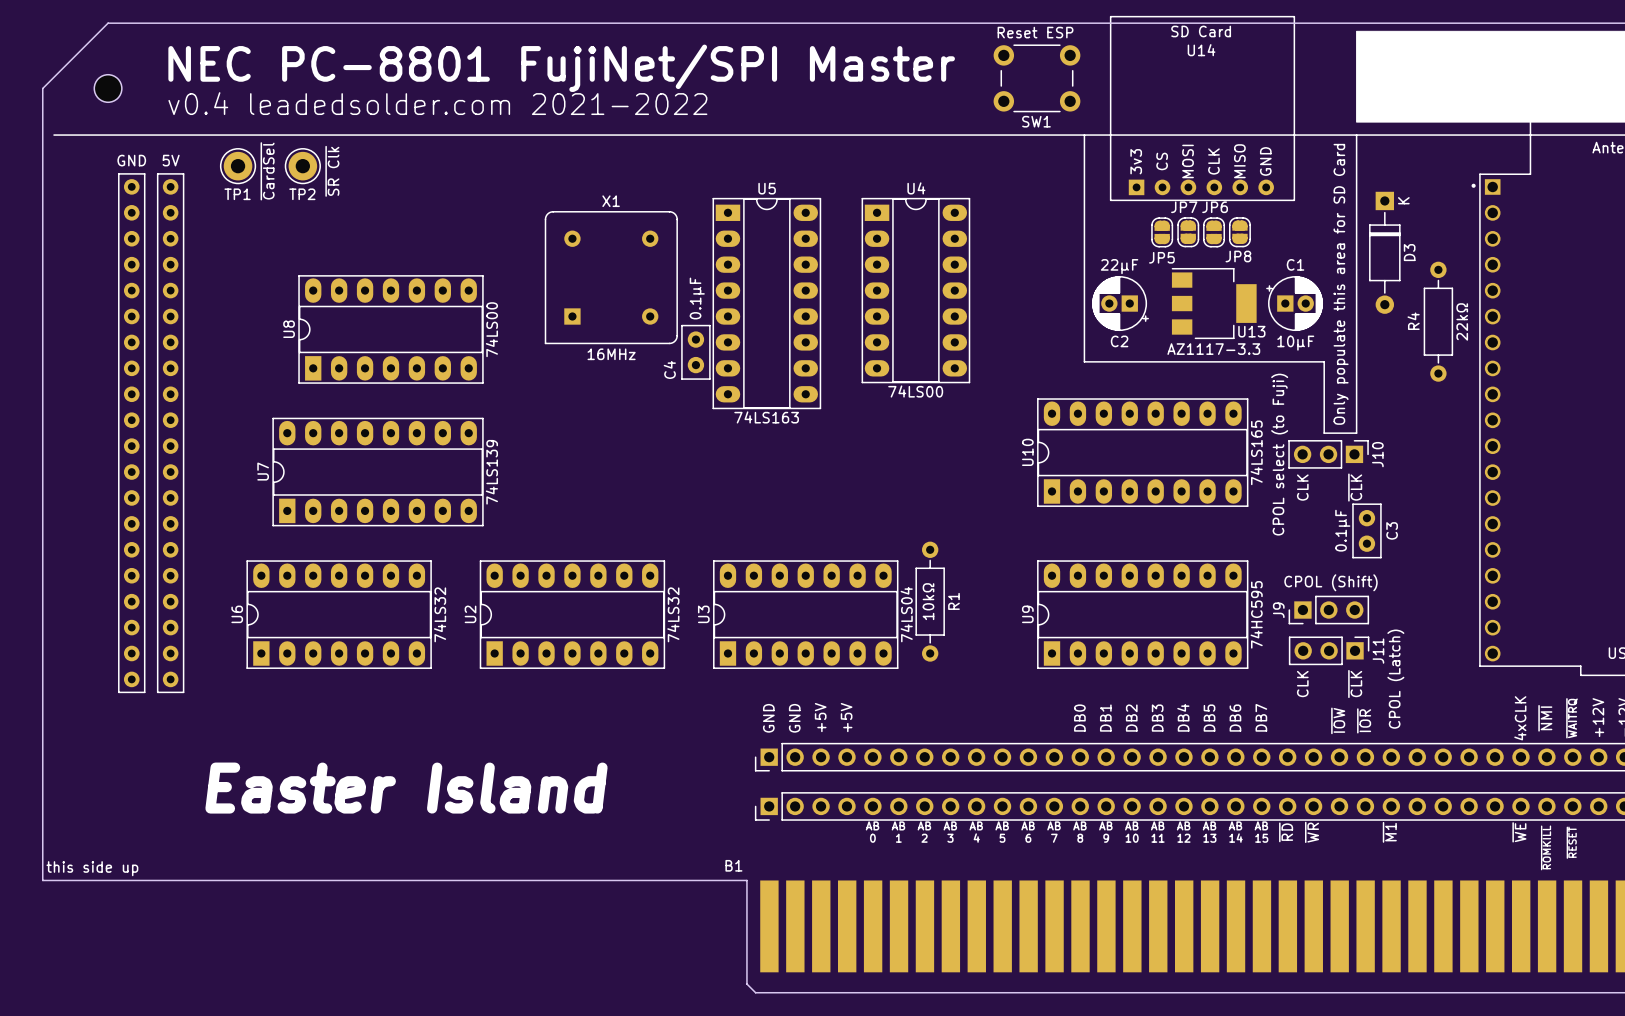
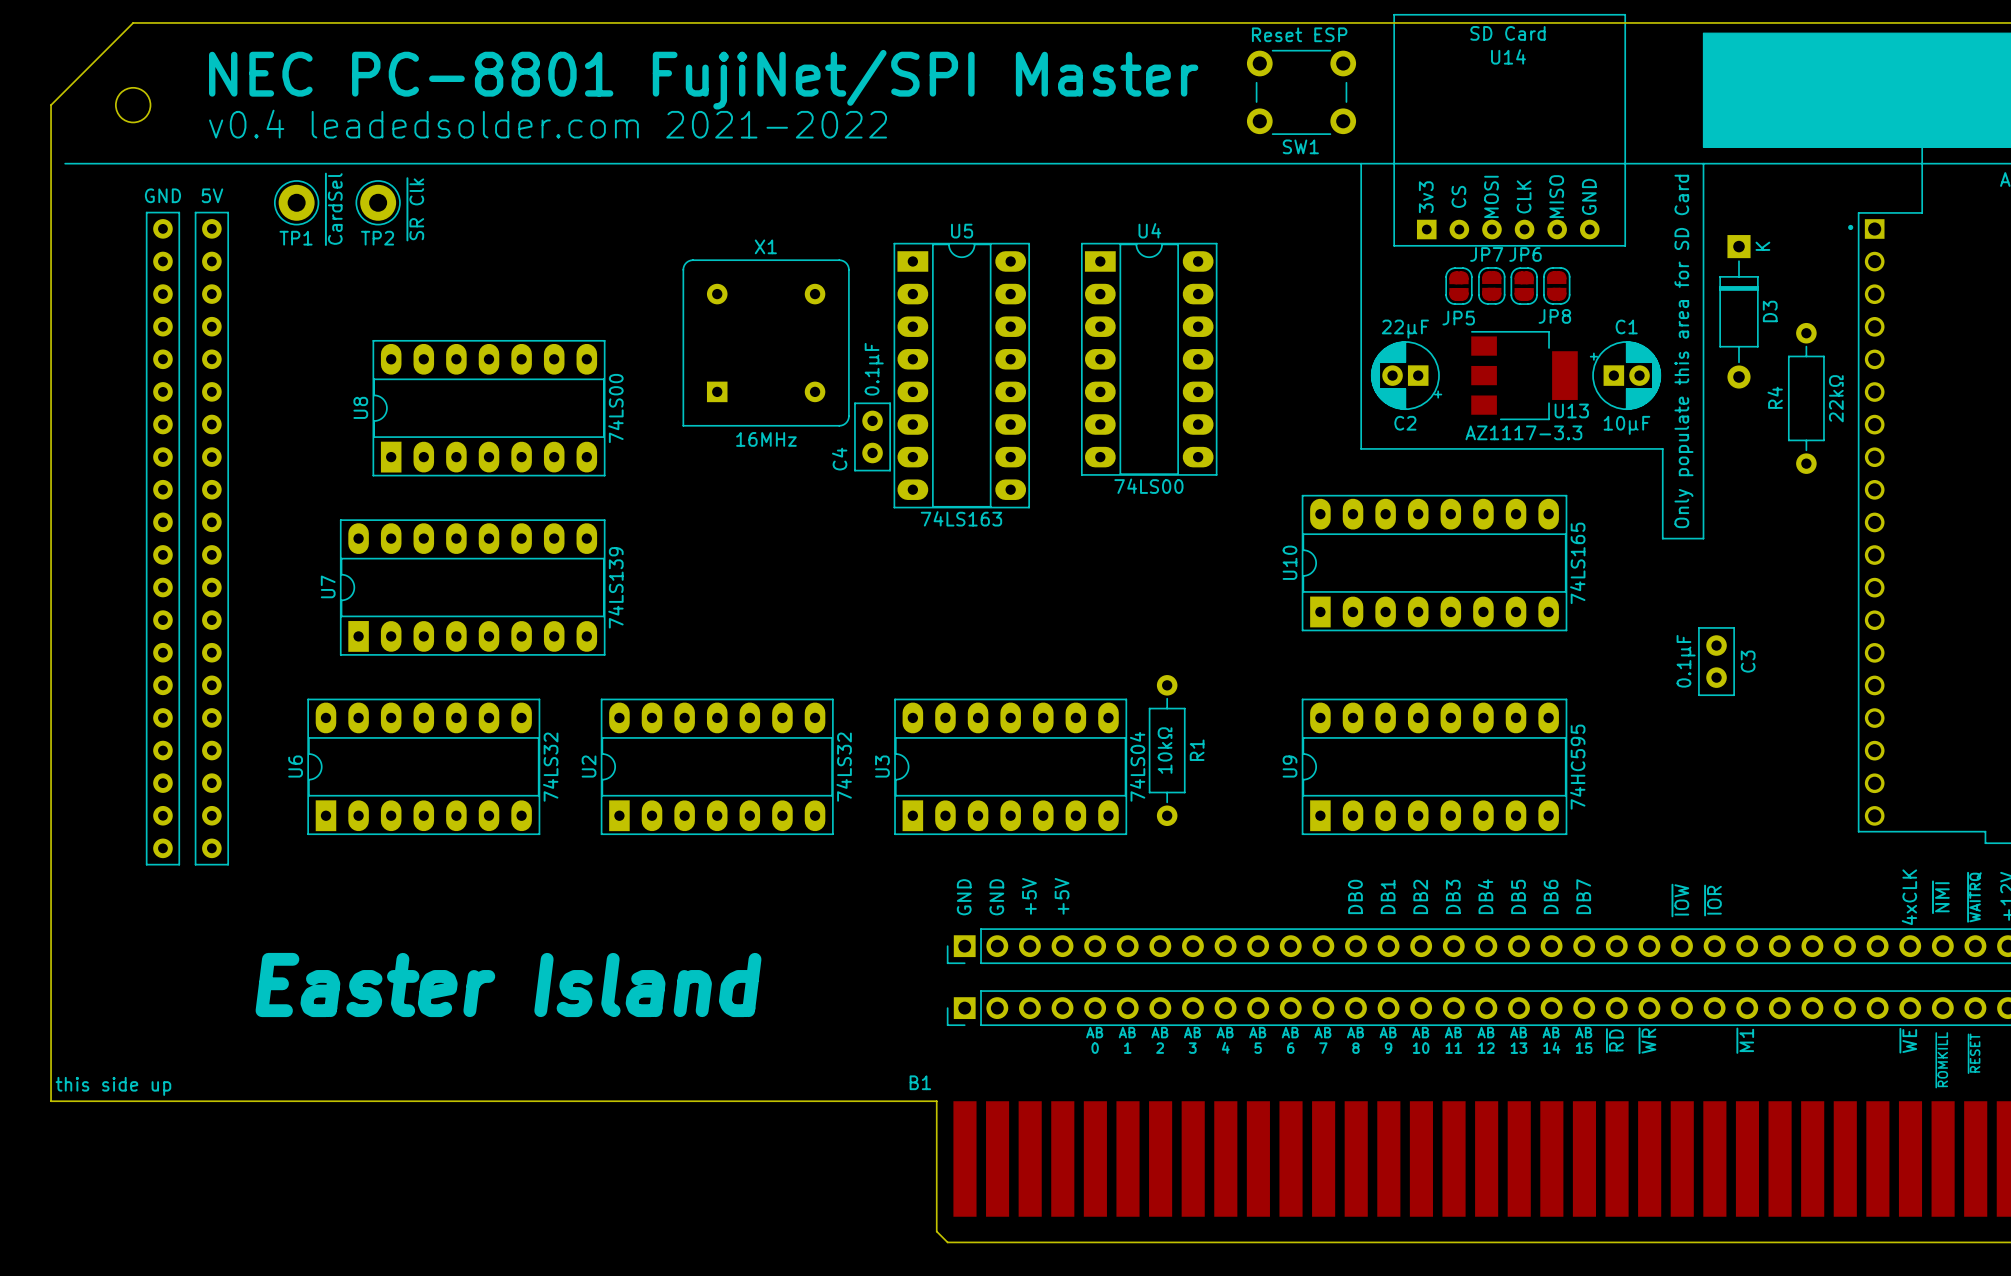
J10: CPOL select (to Fuji) (1328, 454) -> none
text: CLK (1302, 487) -> none
text: ~{CLK} (1355, 487) -> none
J9: CPOL (Shift) (1328, 610) -> none
J11: CPOL (Latch) (1329, 650) -> none
text: CLK (1302, 684) -> none
text: ~{CLK} (1355, 684) -> none

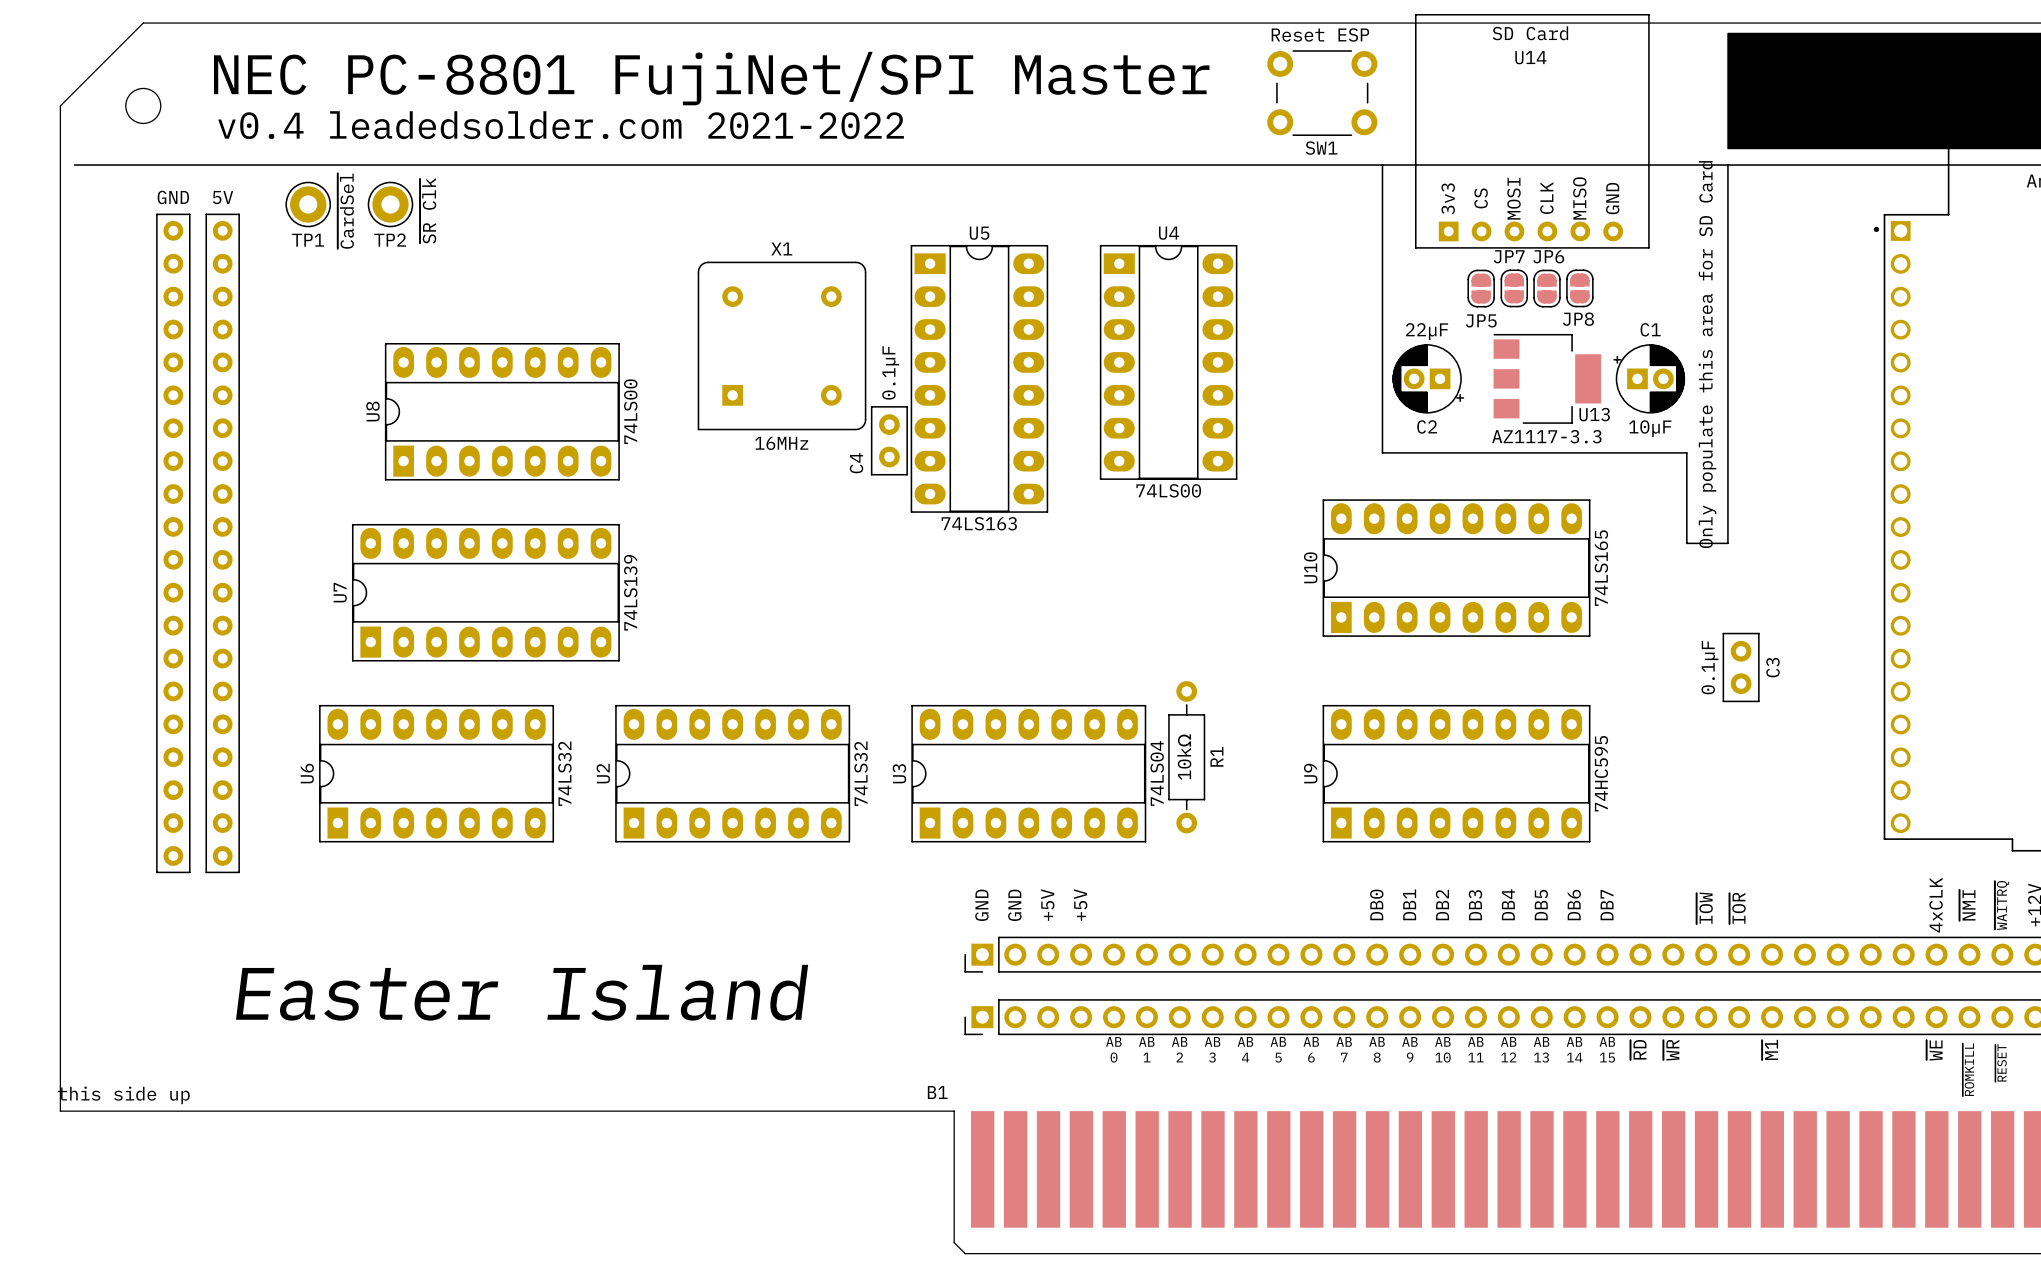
D3: (1739, 311) -> none
R4: 22kΩ (1806, 398) -> none

